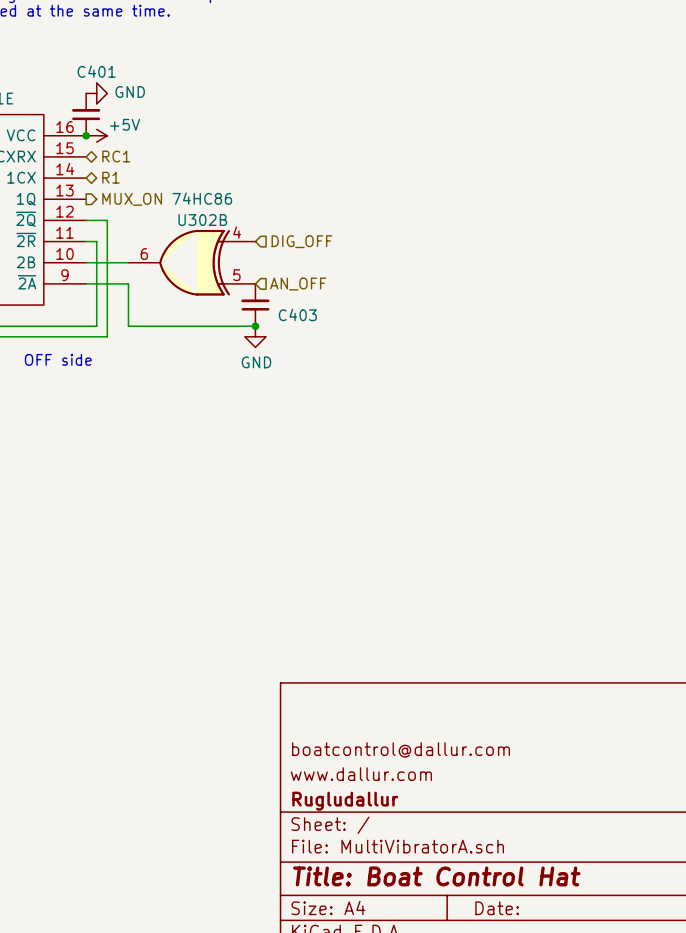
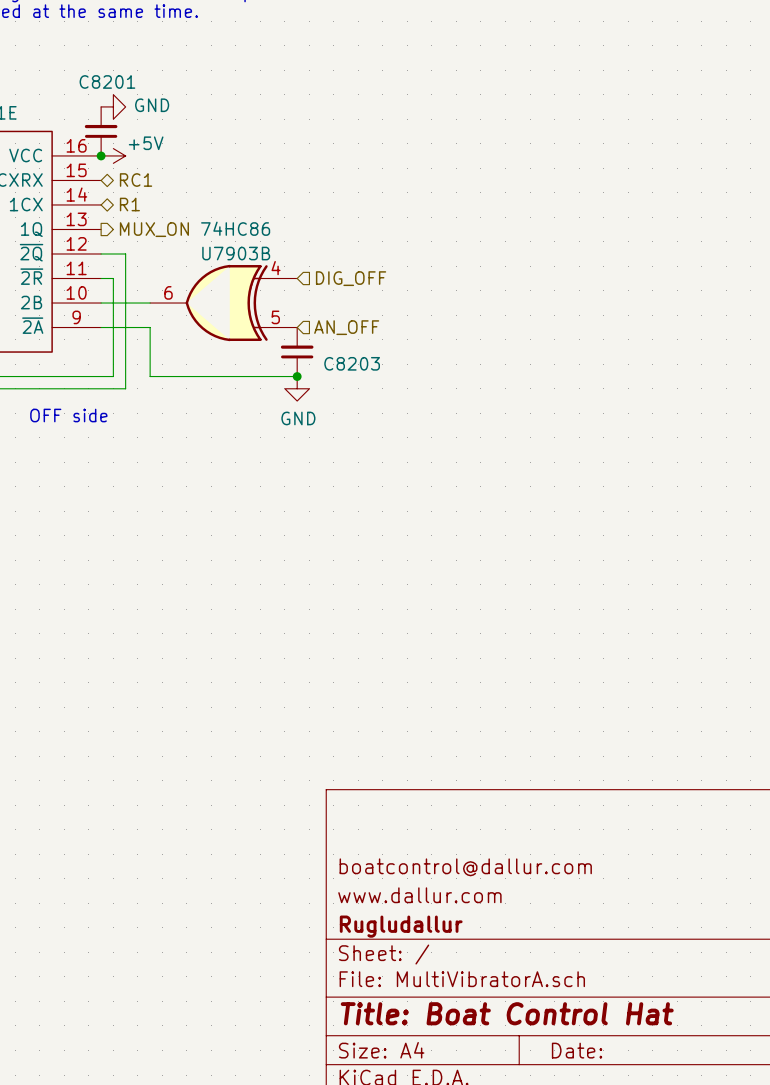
C401 name: C401 (96, 71) -> C8201 (107, 81)
U302B name: U302B (202, 220) -> U7903B (236, 253)
C403 name: C403 (297, 314) -> C8203 (352, 363)

